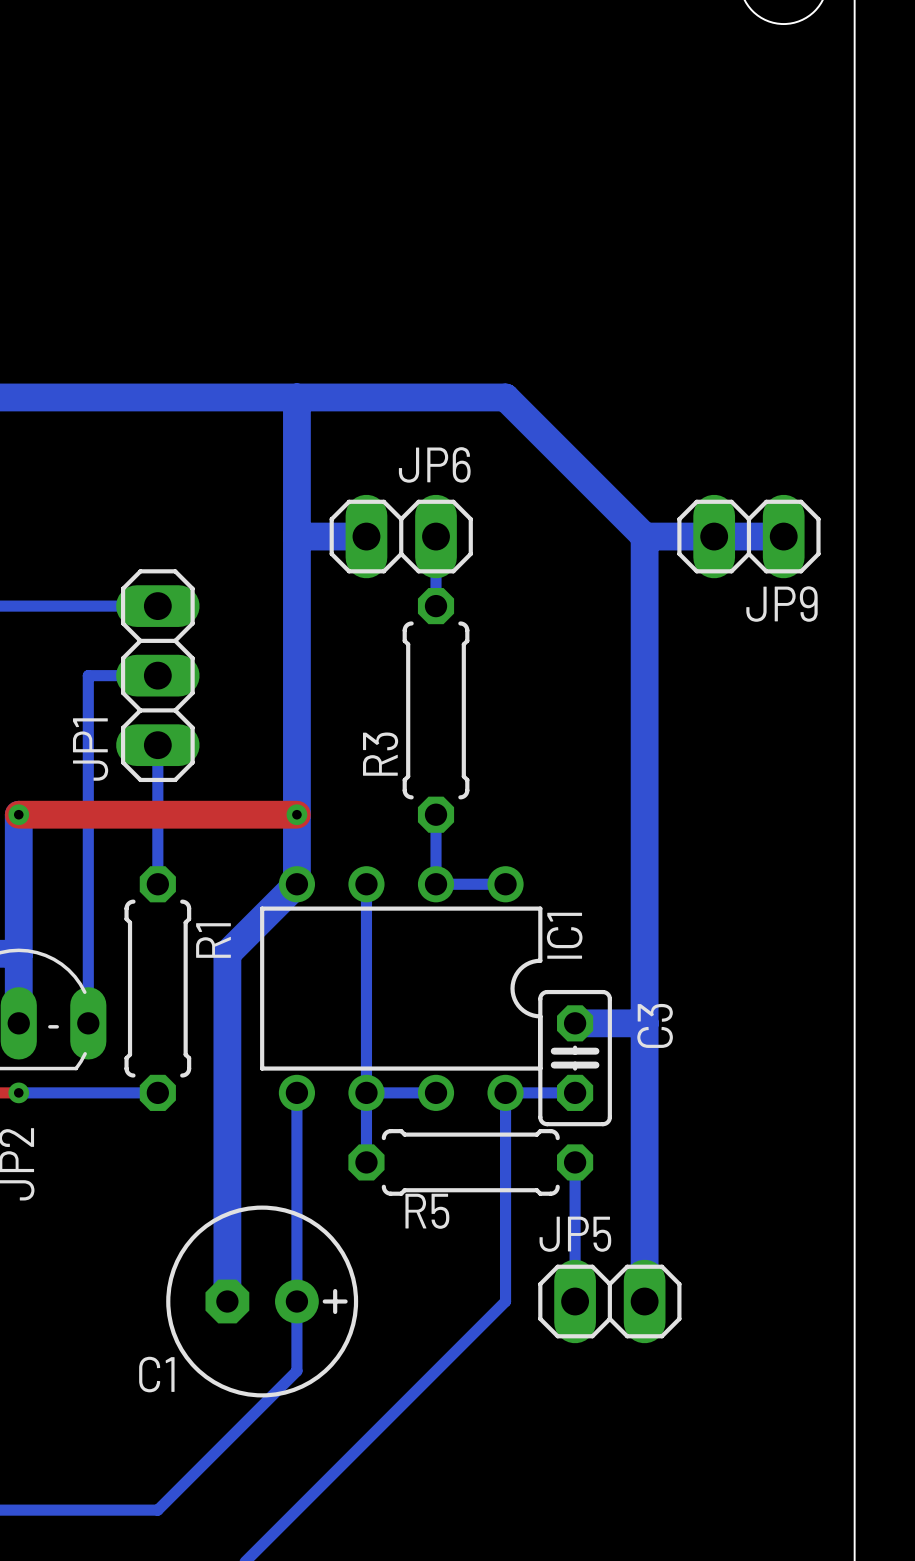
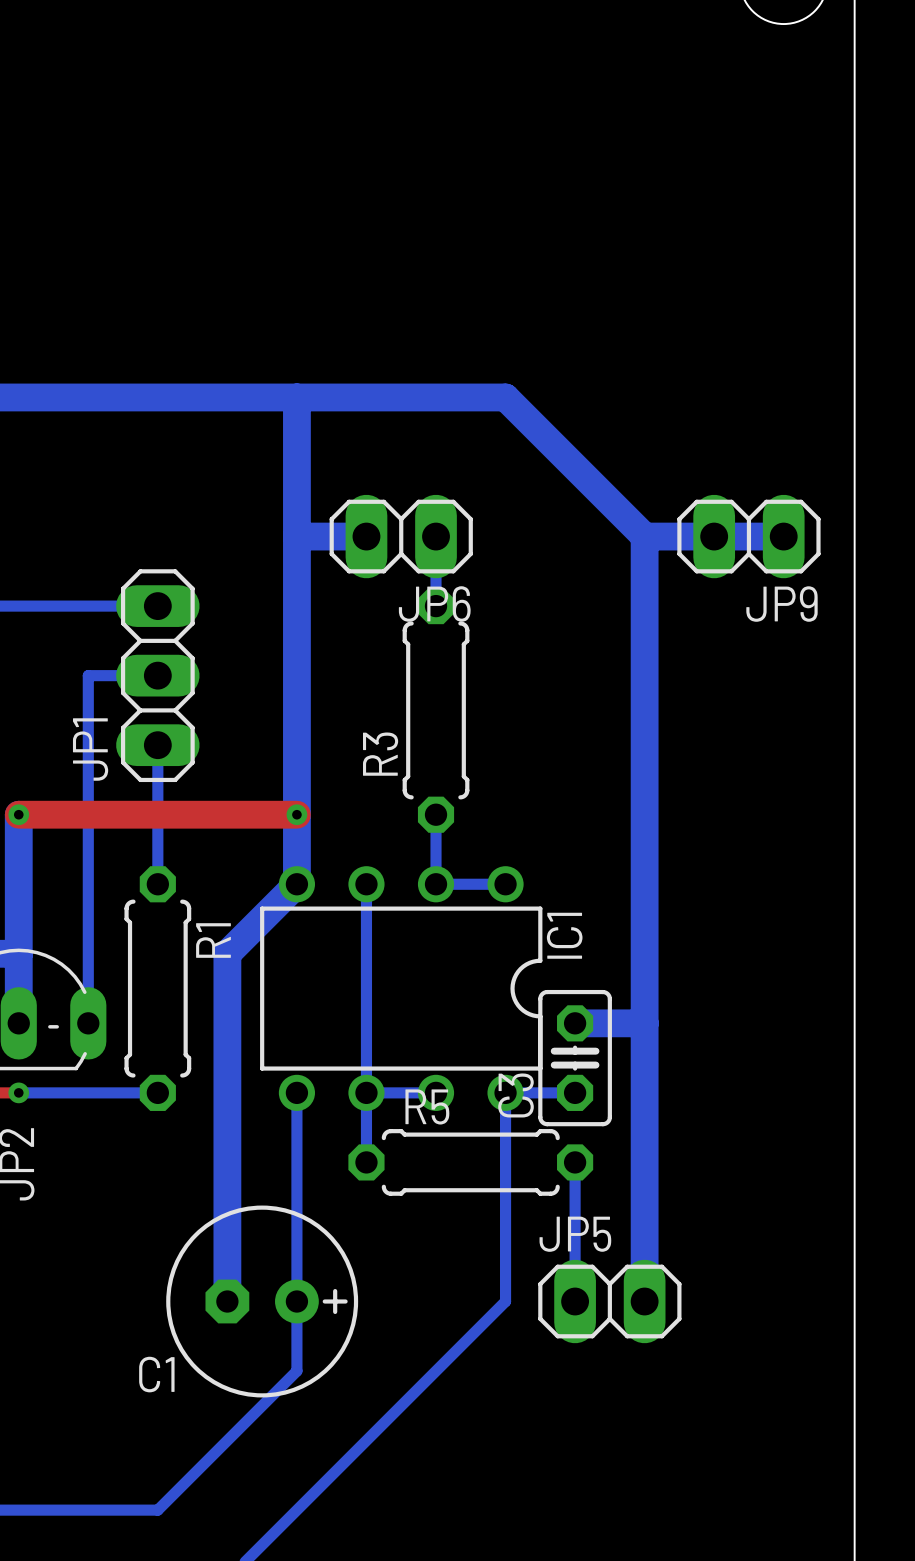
JP6 name position: JP6 (434, 464) -> JP6 (434, 604)
C3 name position: C3 (655, 1025) -> C3 (516, 1095)
R5 name position: R5 (427, 1211) -> R5 (427, 1106)

